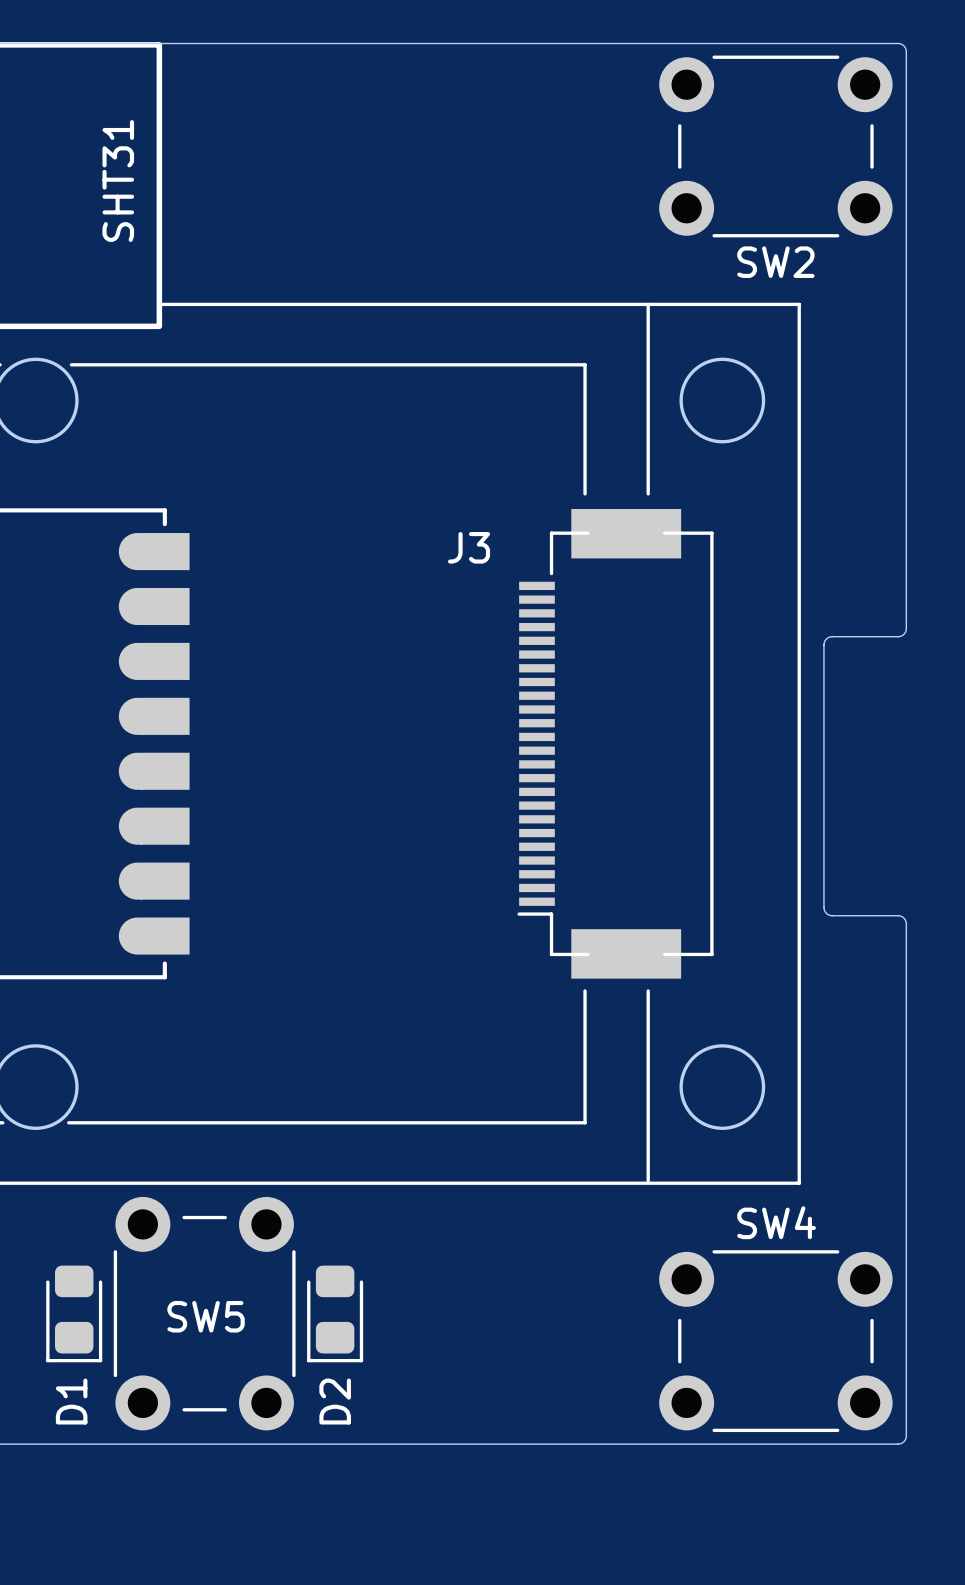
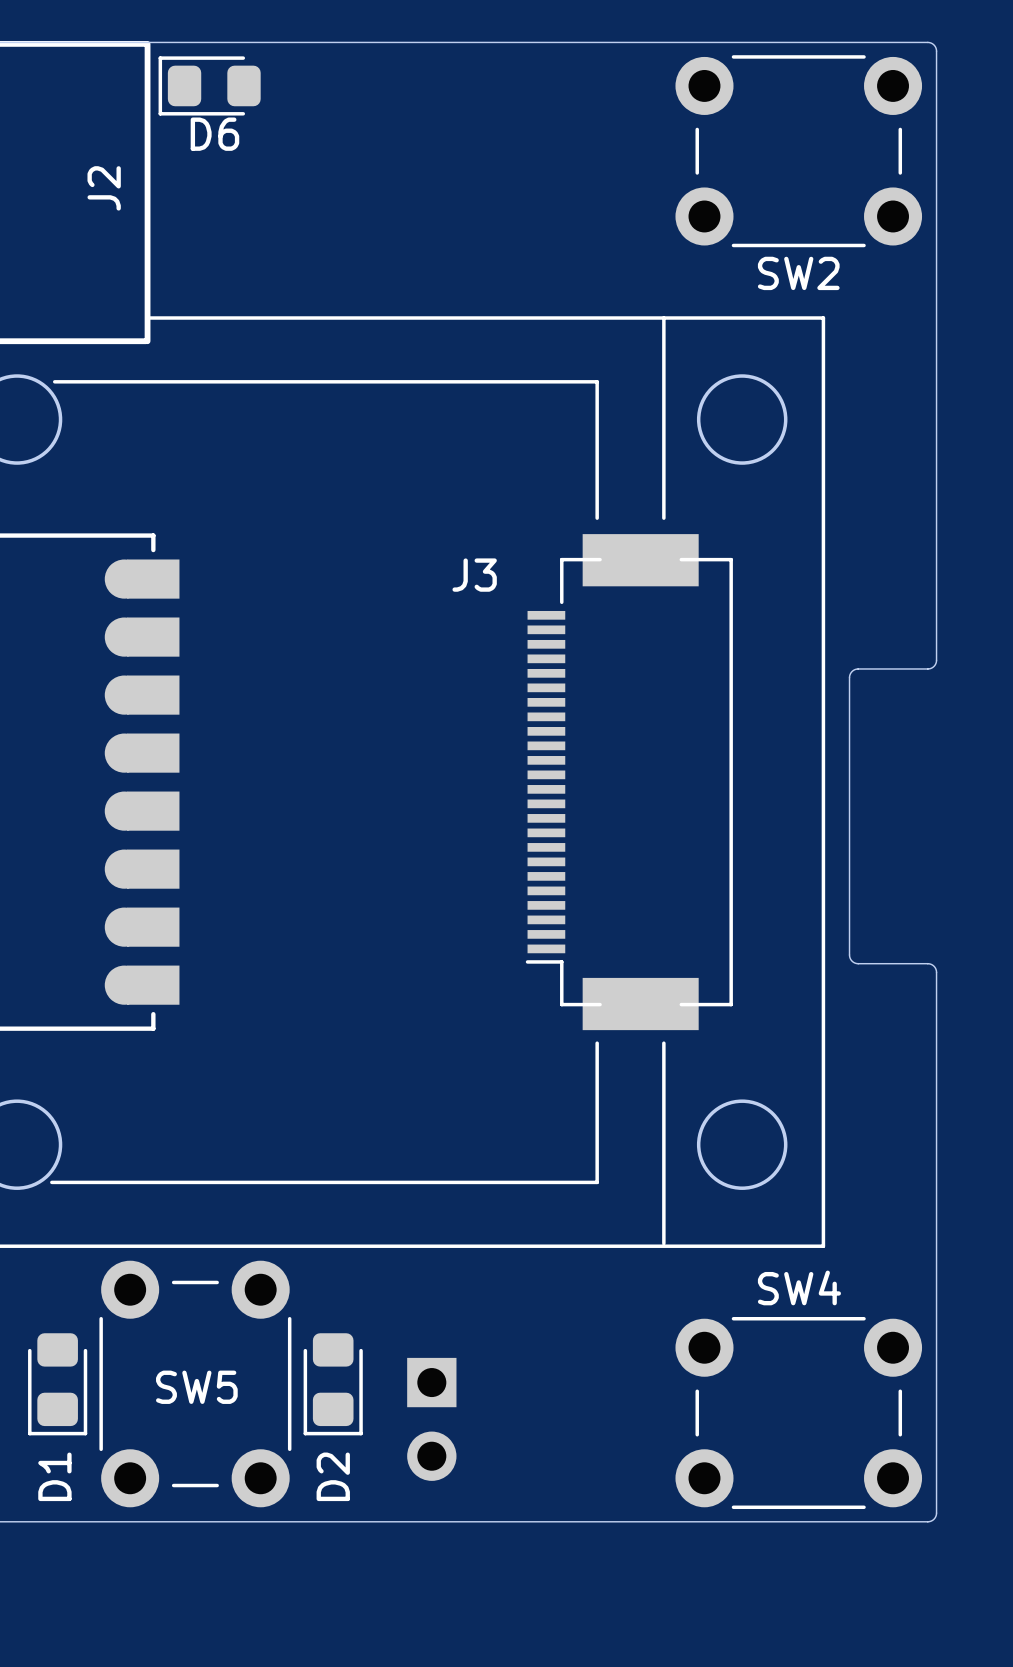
D6: none -> (209, 85)
SHT31 name: SHT31 (118, 181) -> J2 (104, 188)
part: none -> (431, 1419)

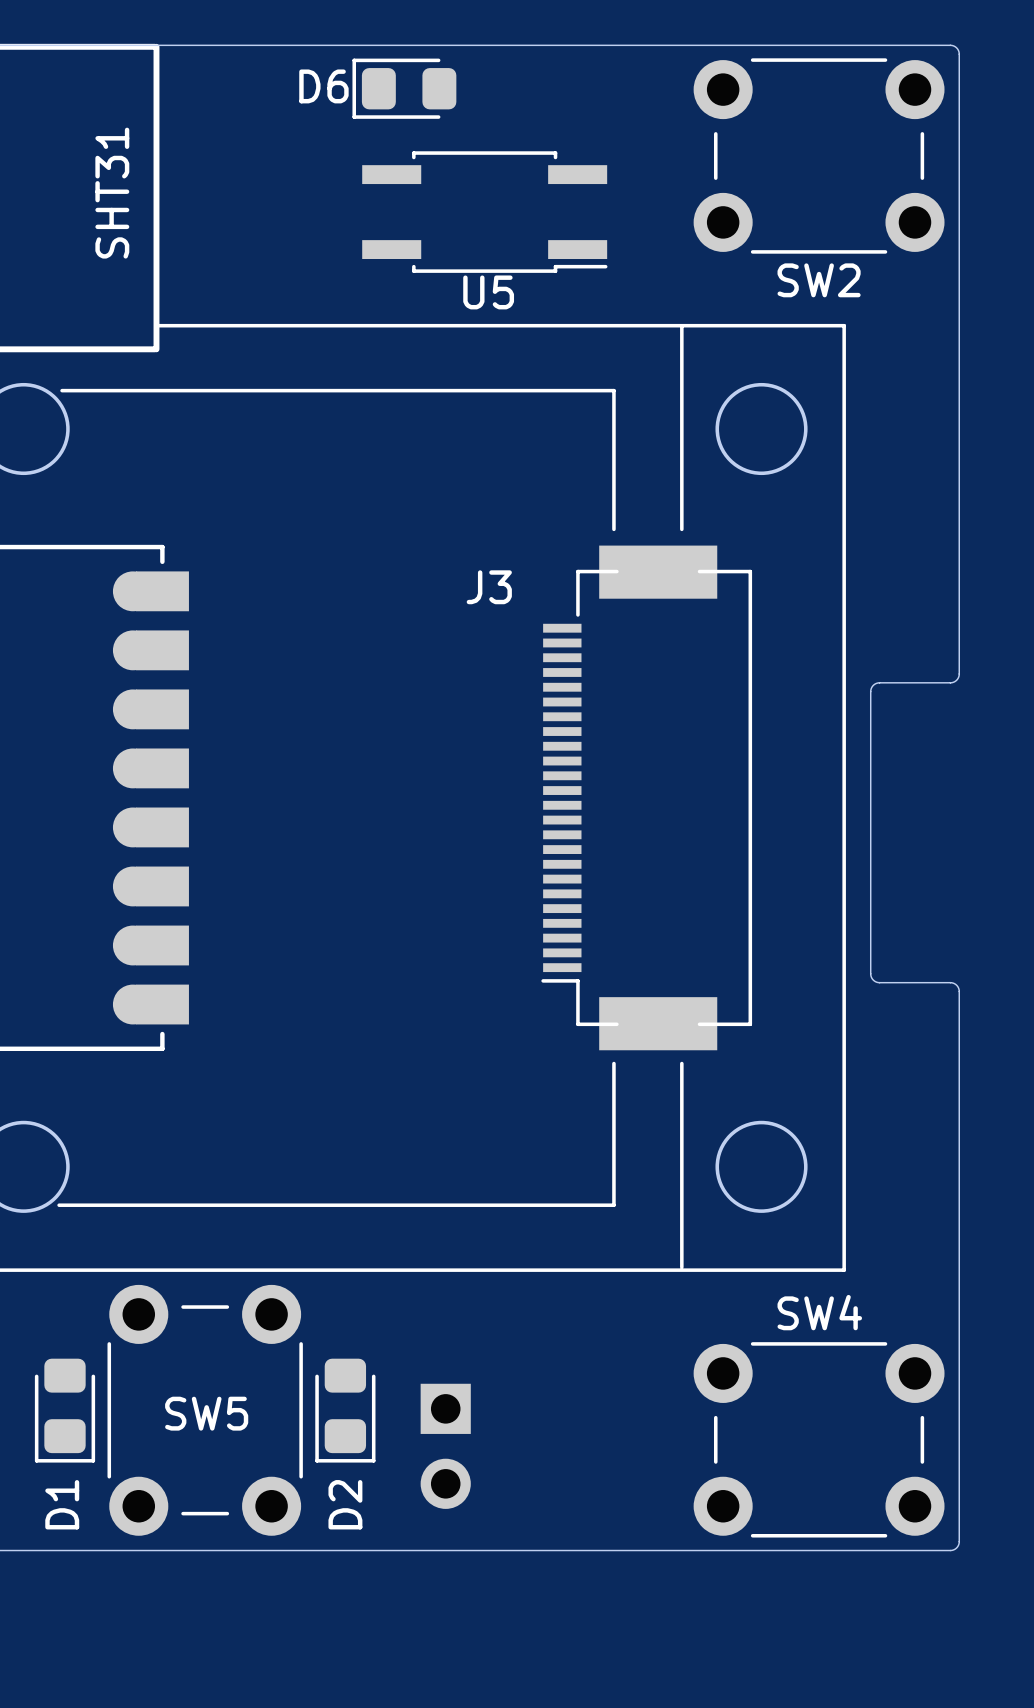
D6 position: (209, 85) -> (404, 88)
D6 name position: D6 (214, 134) -> D6 (323, 86)
J2 name: J2 (104, 188) -> SHT31 (112, 193)
U5: none -> (484, 212)

